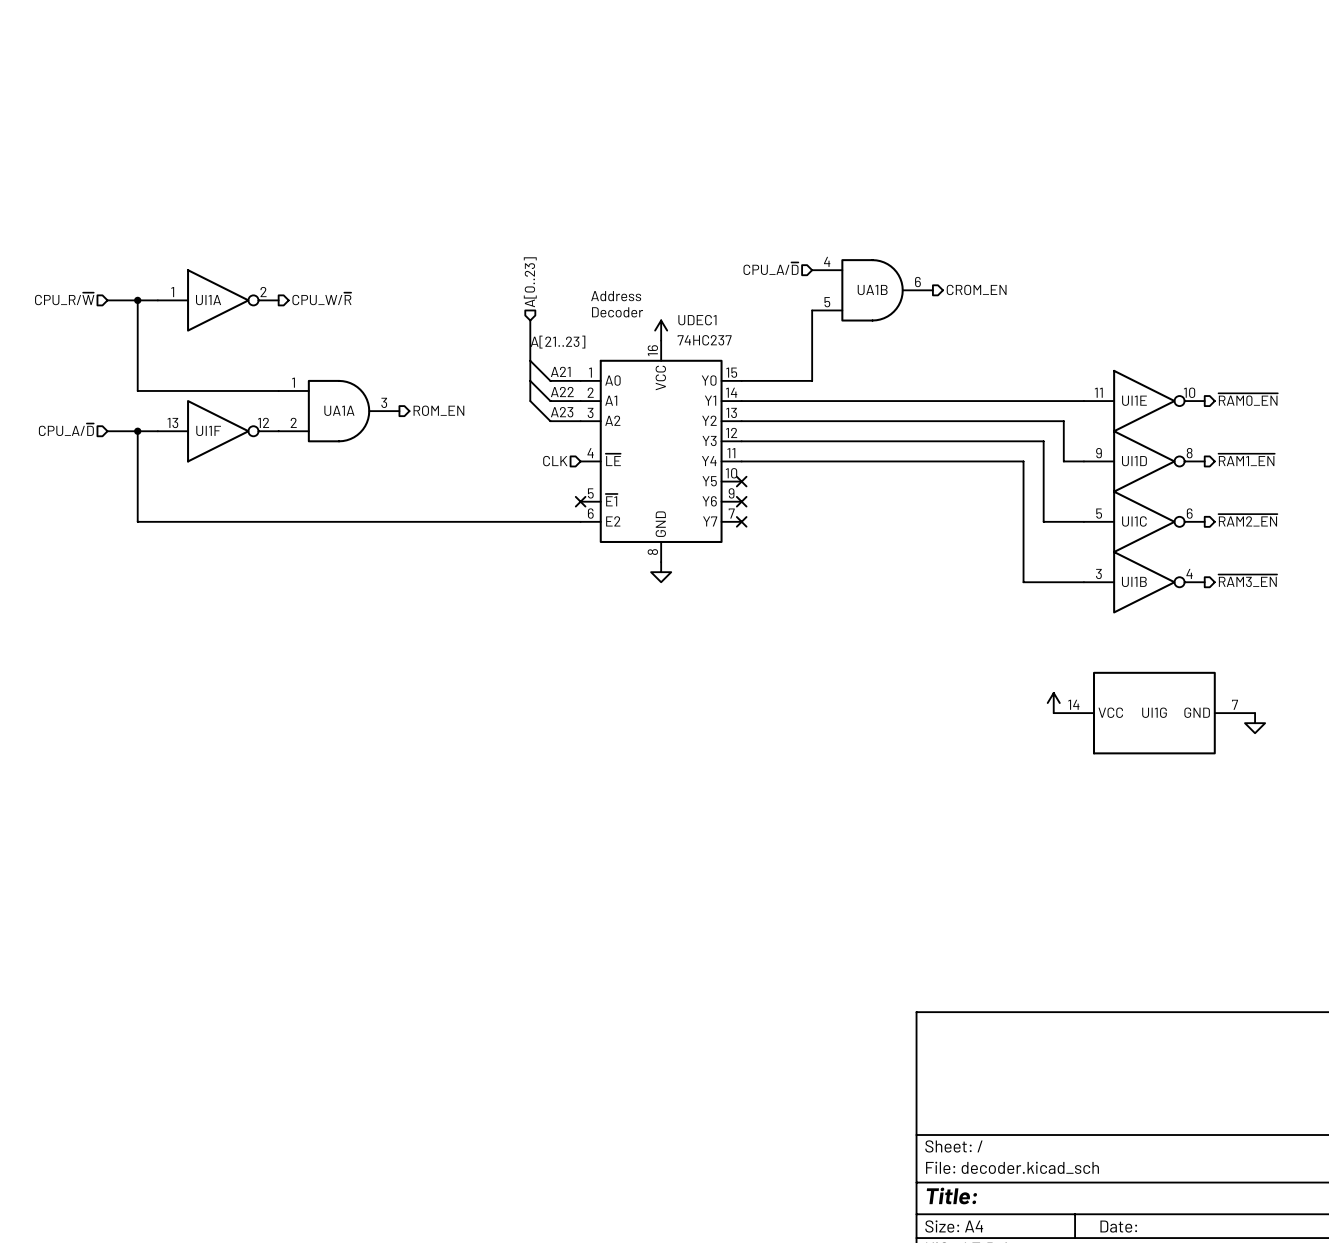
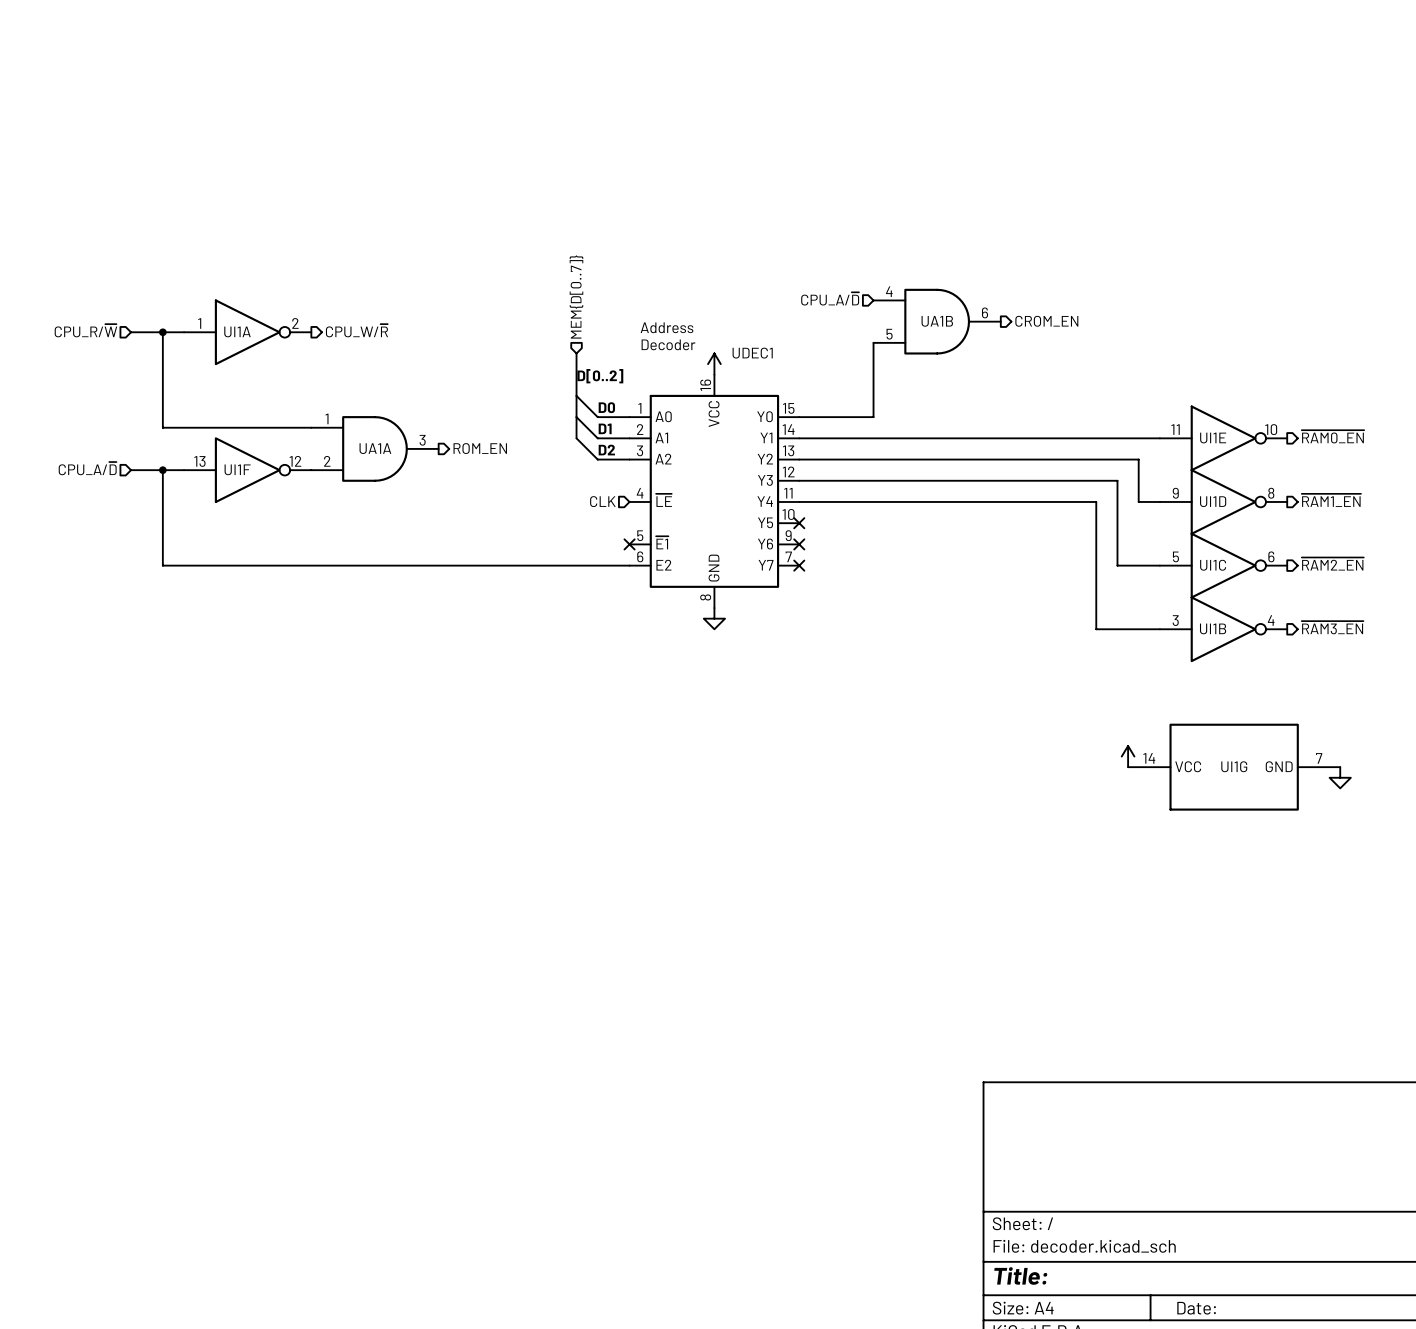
hierarchical label: A[0..23] (530, 282) -> MEM{D[0..7]} (576, 297)
UDEC1 value: 74HC237 (704, 340) -> none
label: A[21..23] (558, 342) -> D[0..2] (600, 376)
label: A21 (560, 371) -> D0 (606, 407)
label: A22 (562, 392) -> D1 (605, 428)
label: A23 (562, 412) -> D2 (606, 450)

